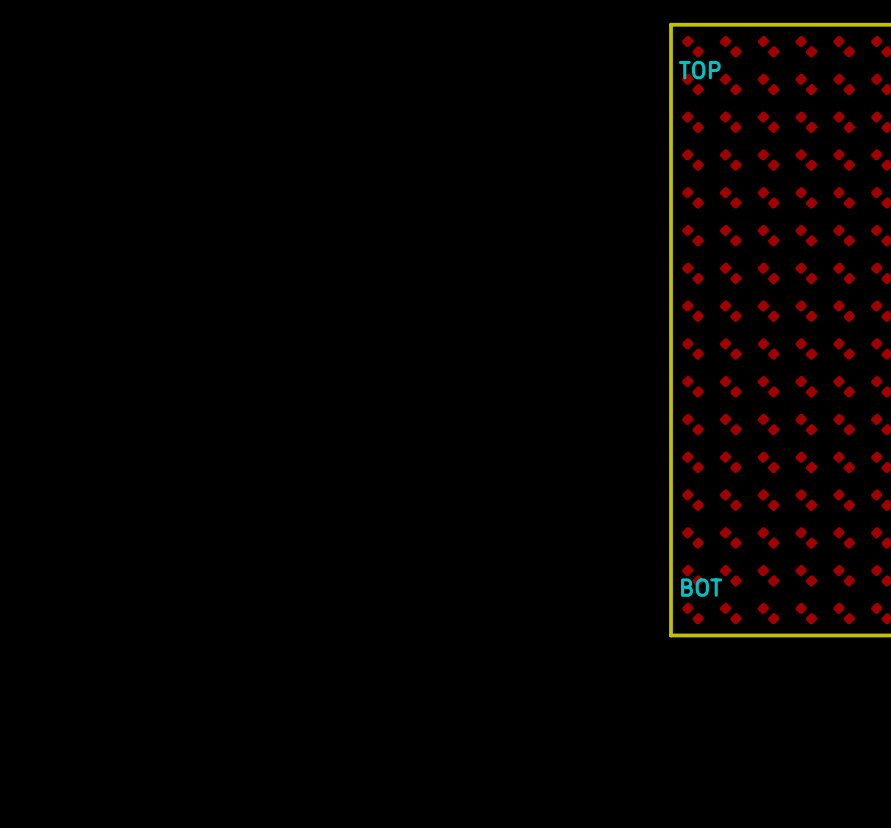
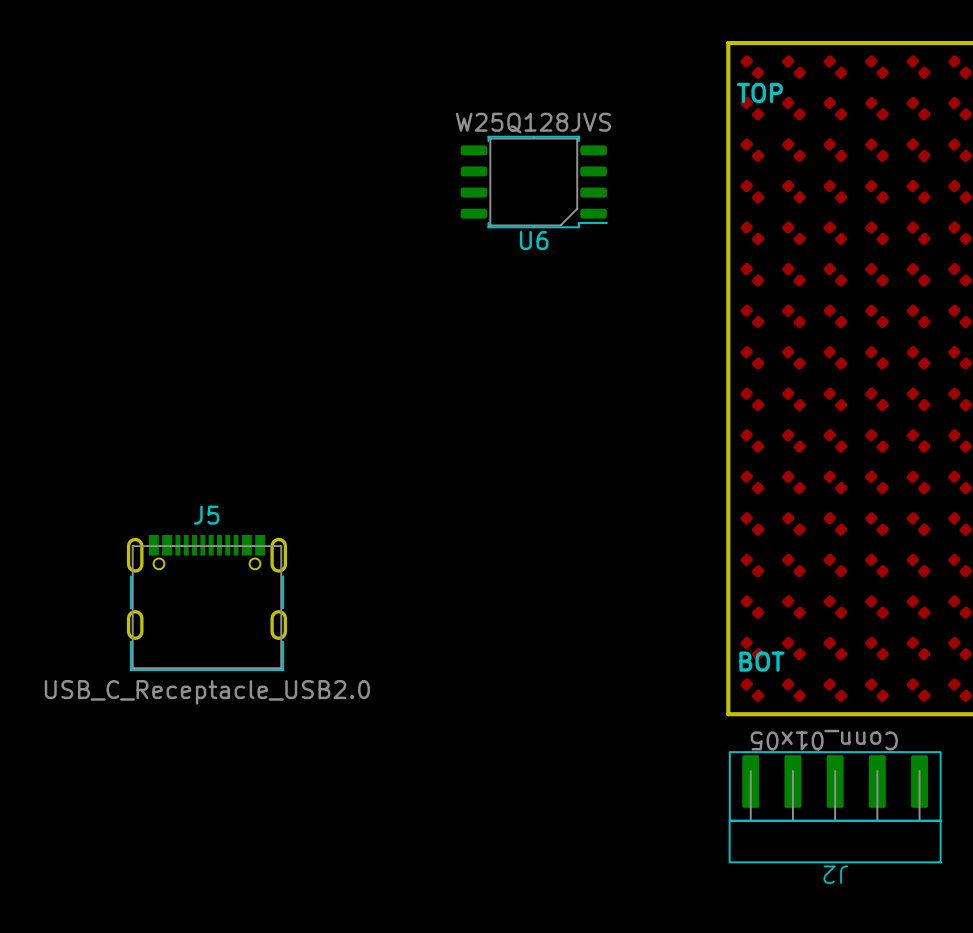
U6: none -> W25Q128JVS (534, 182)
J5: none -> USB_C_Receptacle_USB2.0 (206, 602)
J2: none -> Conn_01x05 (835, 807)

